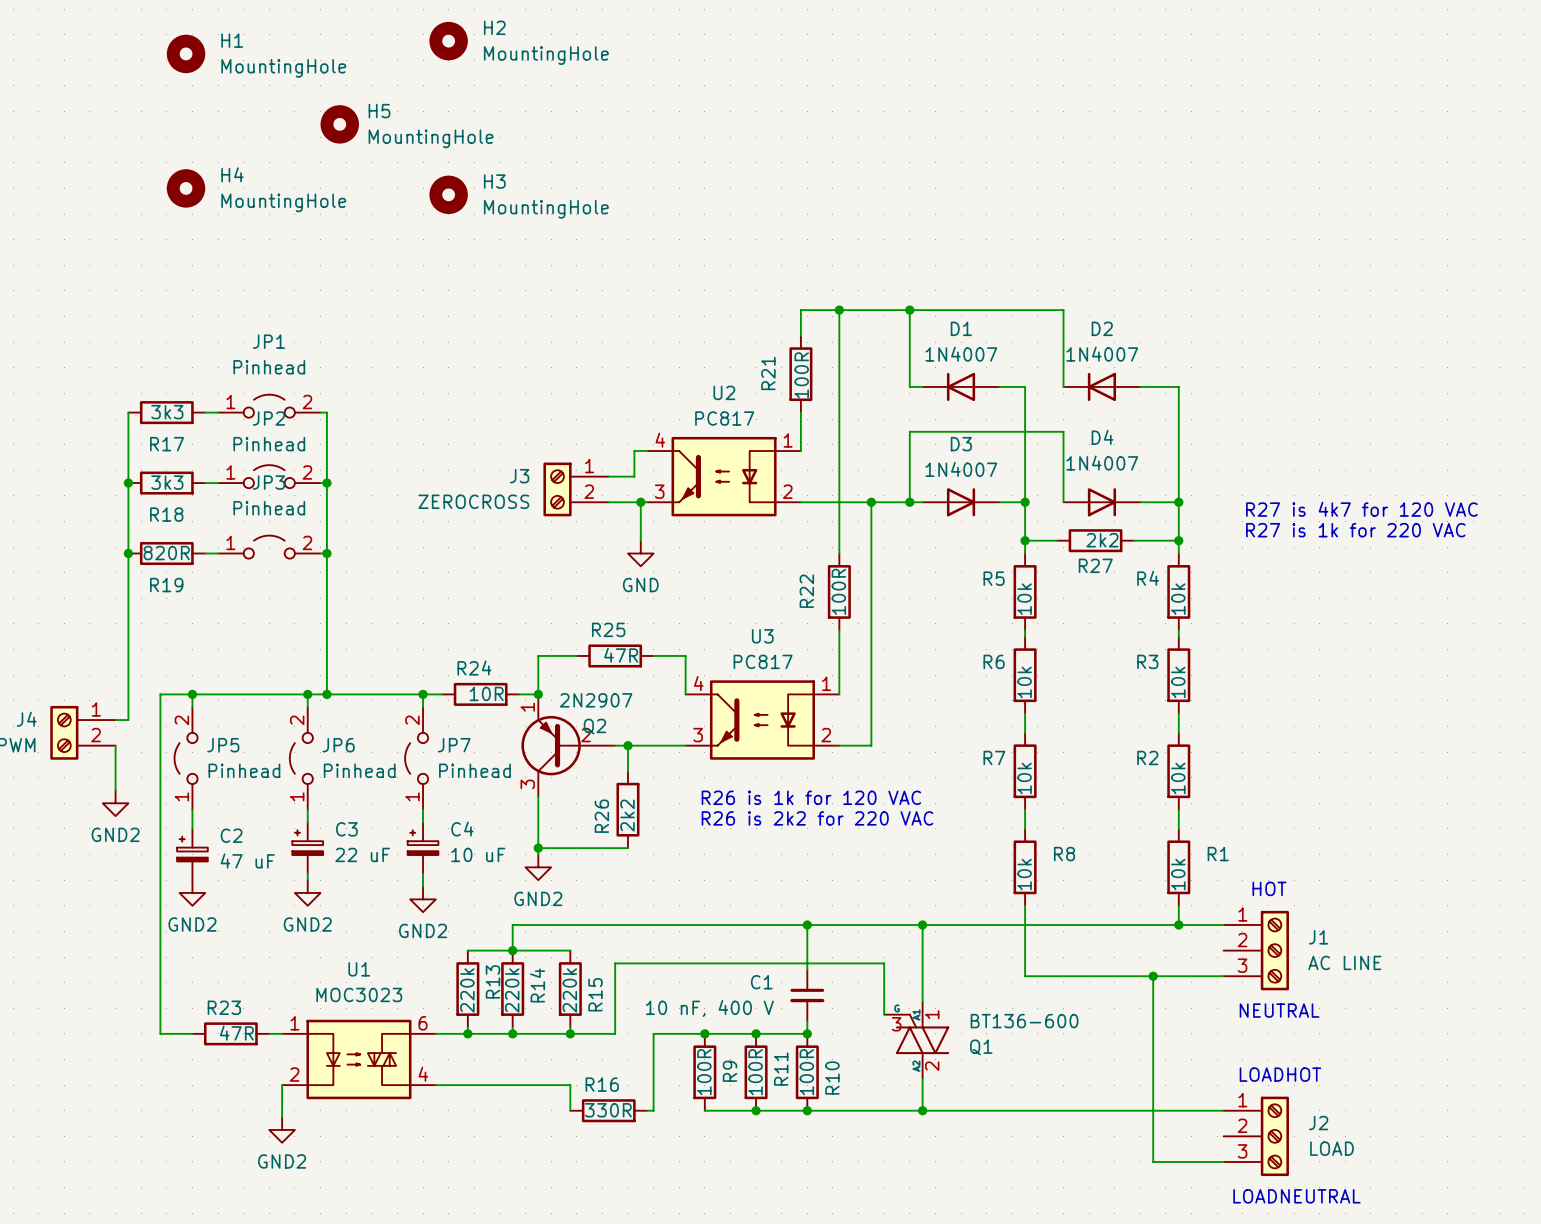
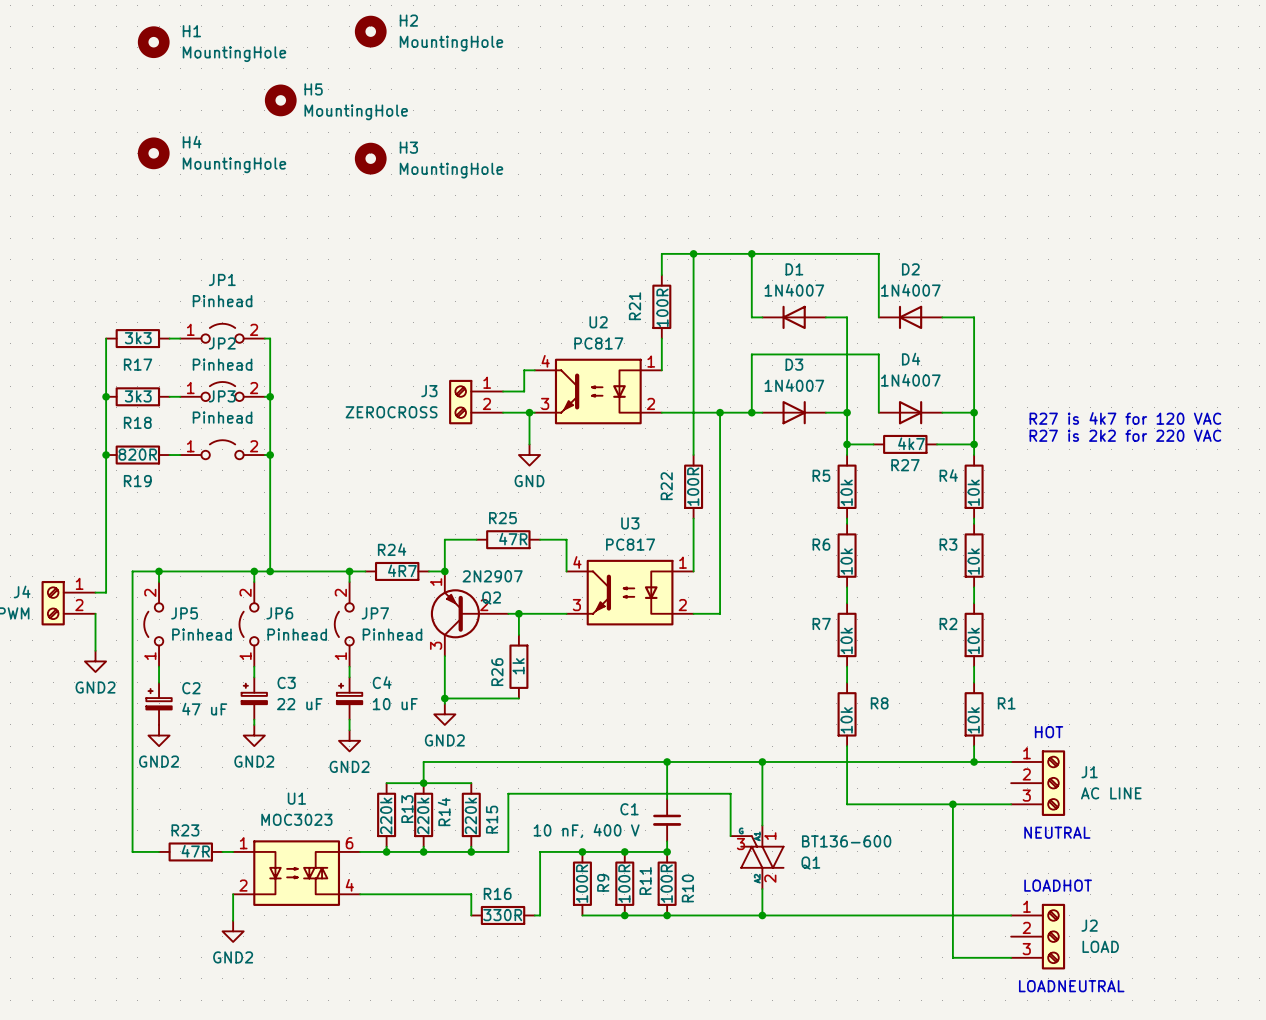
text: R27 is 1k for 220 VAC (1355, 530) -> R27 is 2k2 for 220 VAC (1125, 435)
R27 value: 2k2 (1102, 540) -> 4k7 (911, 443)
R24 value: 10R (486, 693) -> 4R7 (402, 570)
text: R26 is 1k for 120 VAC (811, 797) -> none
R26 value: 2k2 (627, 815) -> 1k (518, 666)
text: R26 is 2k2 for 220 VAC (817, 818) -> none

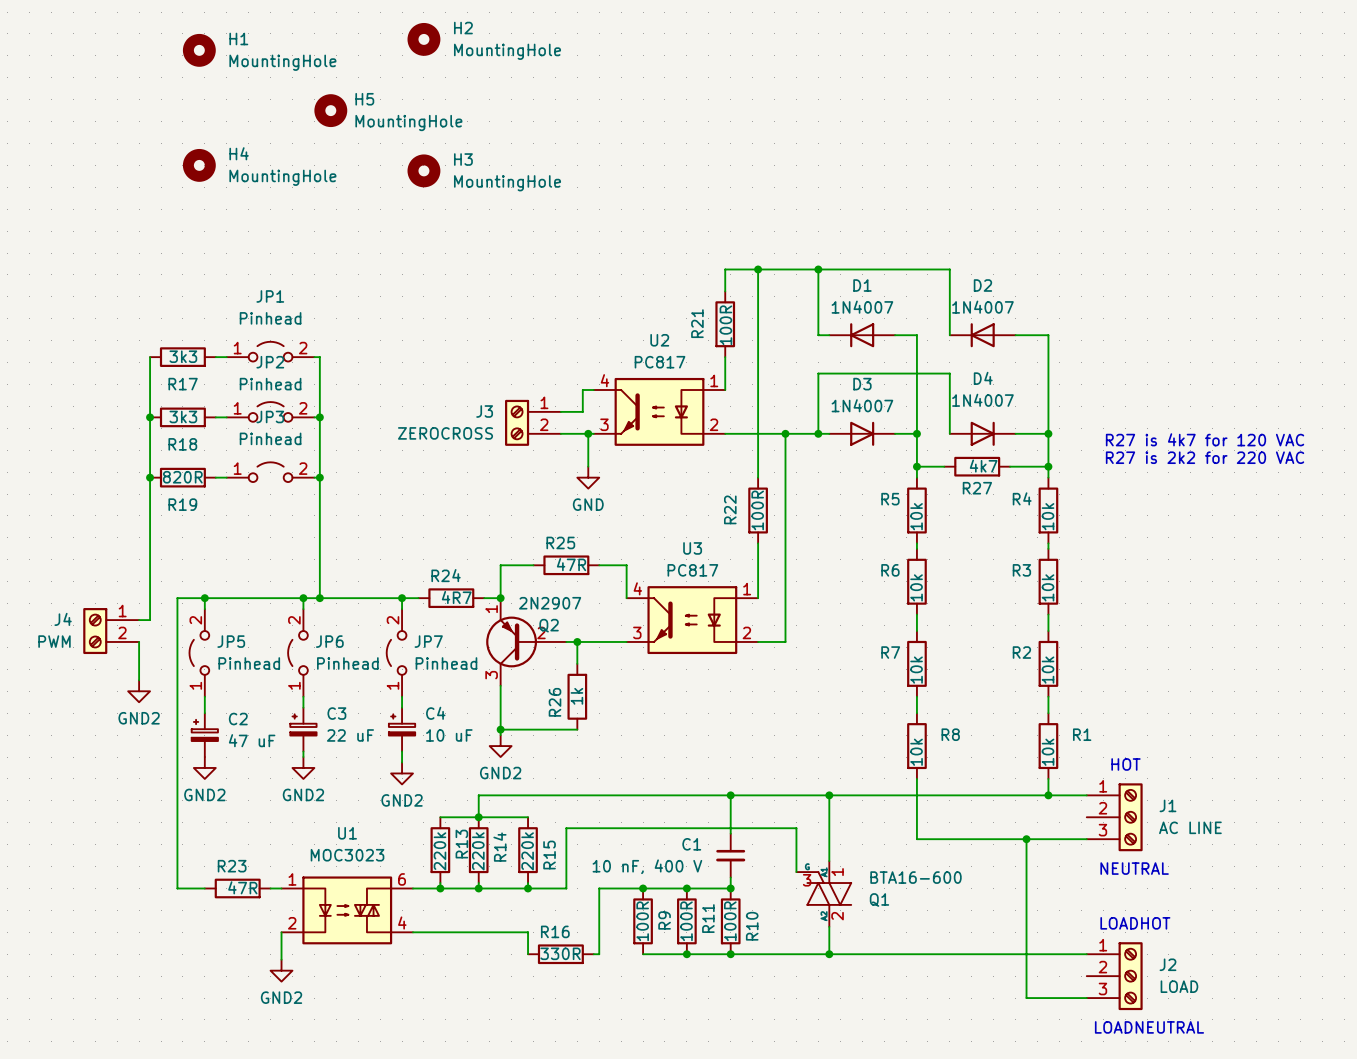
Q1 value: BT136-600 (846, 841) -> BTA16-600 (916, 877)

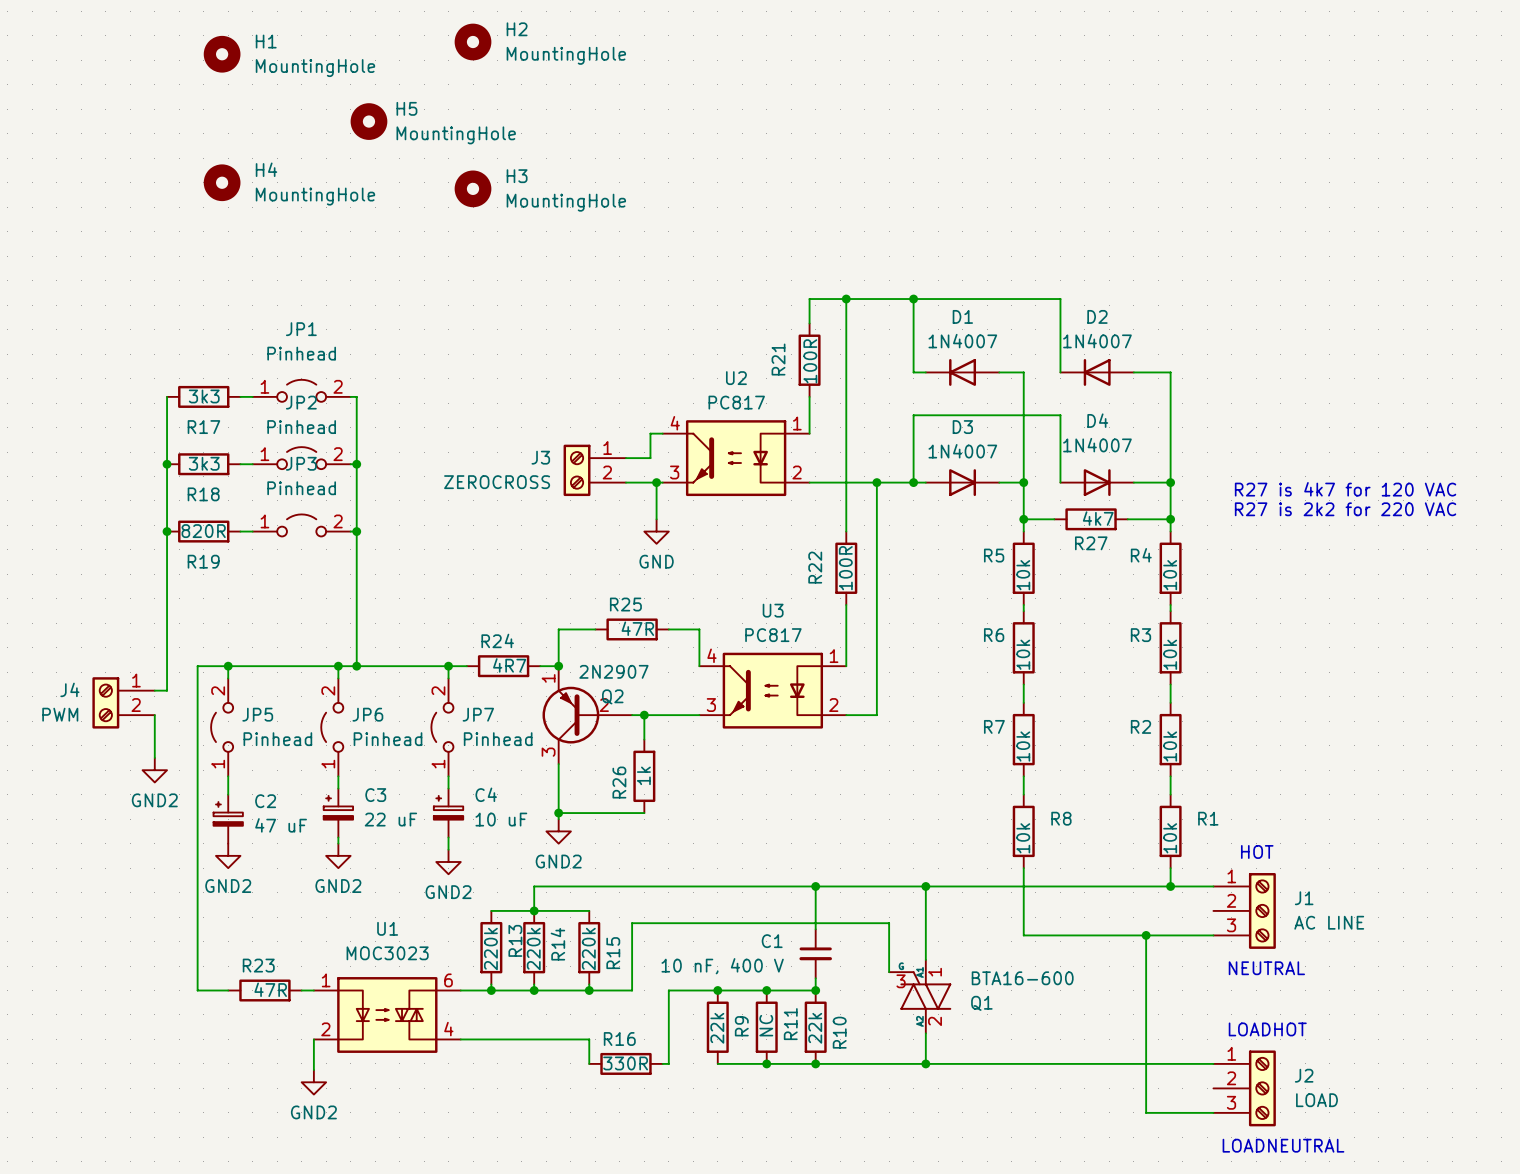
R9 value: 100R (642, 921) -> 22k (717, 1028)
R11 value: 100R (686, 921) -> NC (766, 1025)
R10 value: 100R (730, 921) -> 22k (815, 1028)

